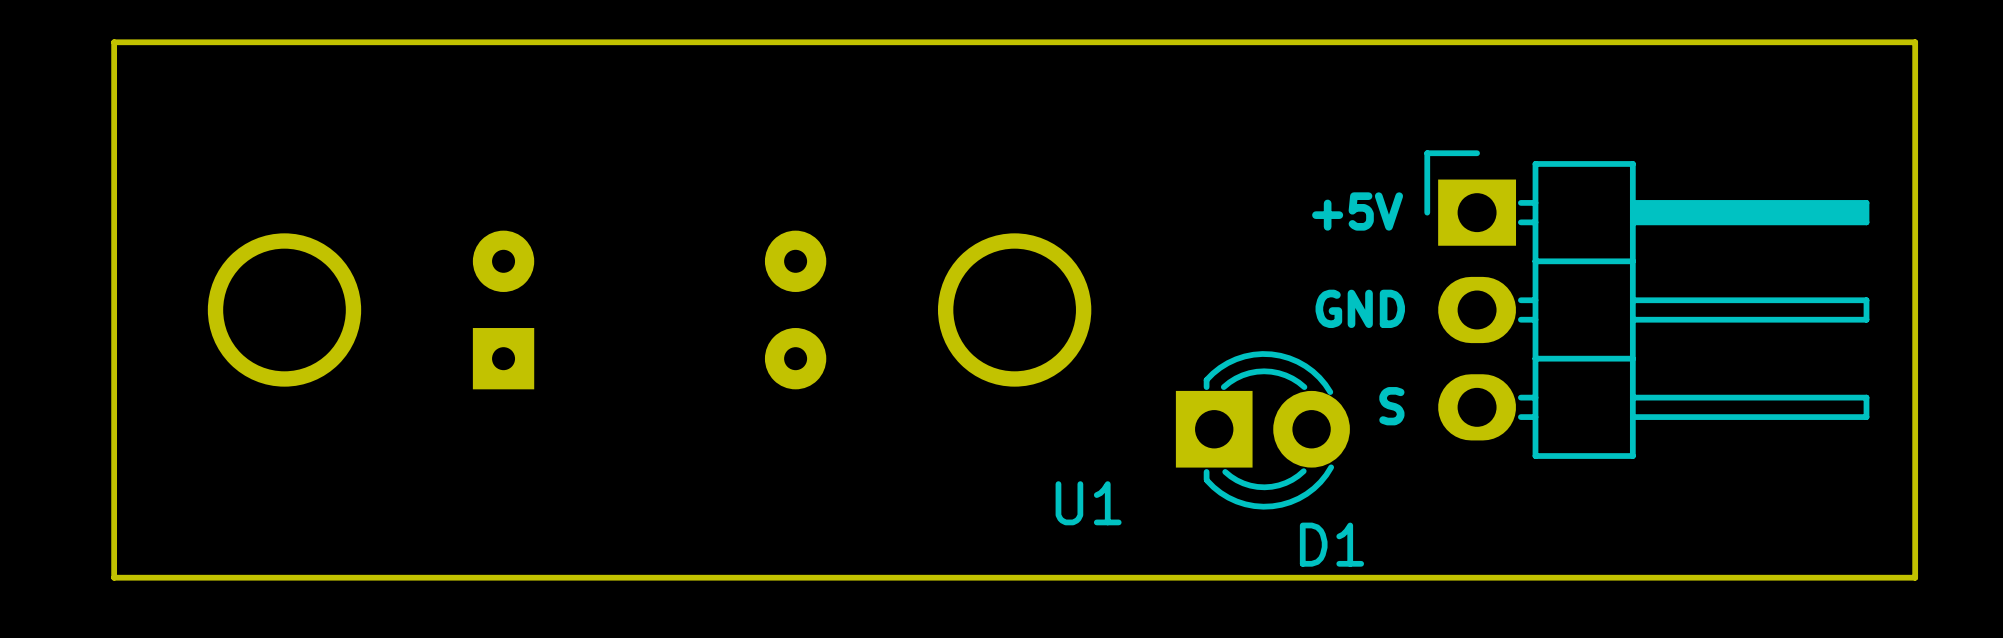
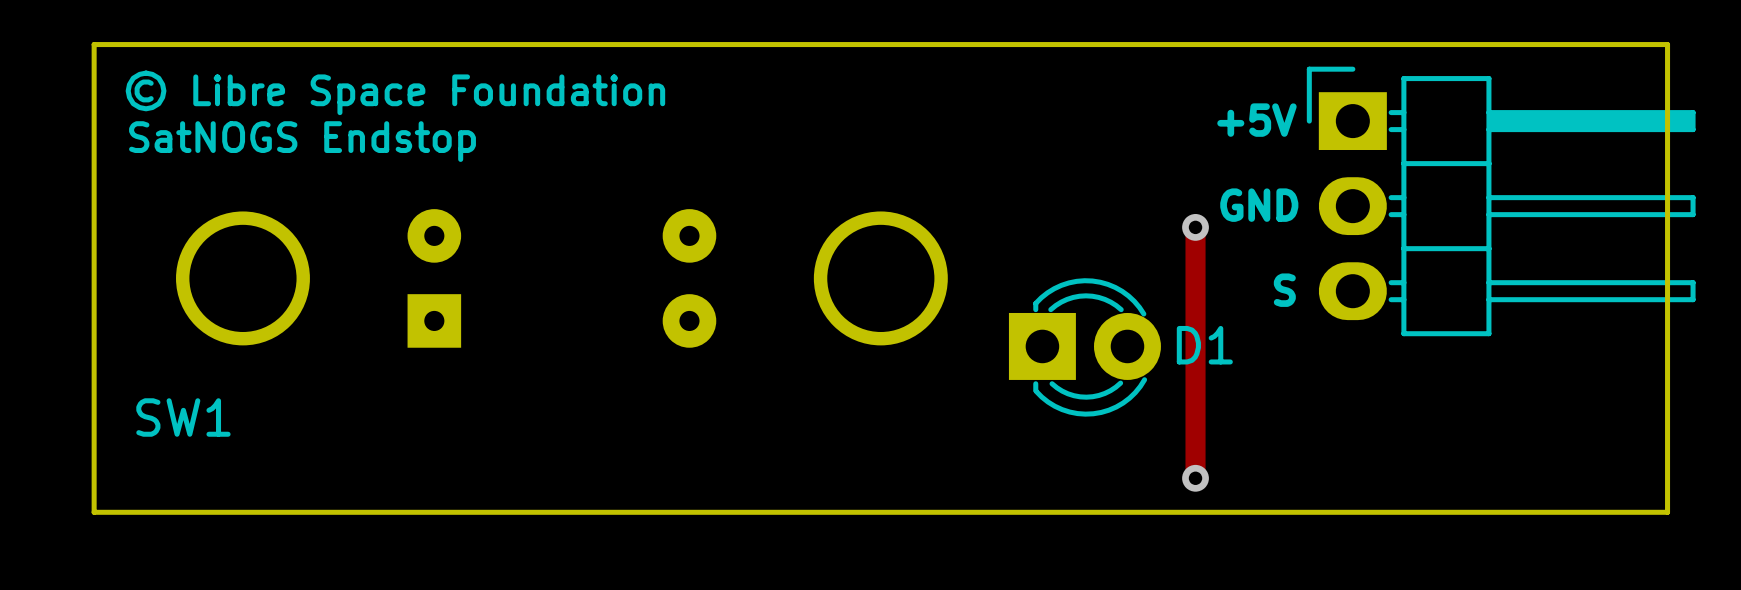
SatNOGS Endstop: none -> © Libre Space Foundation (395, 116)
text position: +5V (1357, 211) -> +5V (1256, 120)
track: none -> (1195, 227) (1195, 478)
via: none -> (1195, 227)
part position: (1646, 304) -> (1501, 201)
text position: GND (1360, 308) -> GND (1259, 205)
text position: S (1391, 406) -> S (1284, 290)
D1 position: (1262, 430) -> (1084, 347)
U1 name: U1 (1088, 503) -> SW1 (183, 417)
via: none -> (1195, 478)
D1 name position: D1 (1331, 544) -> D1 (1204, 345)

